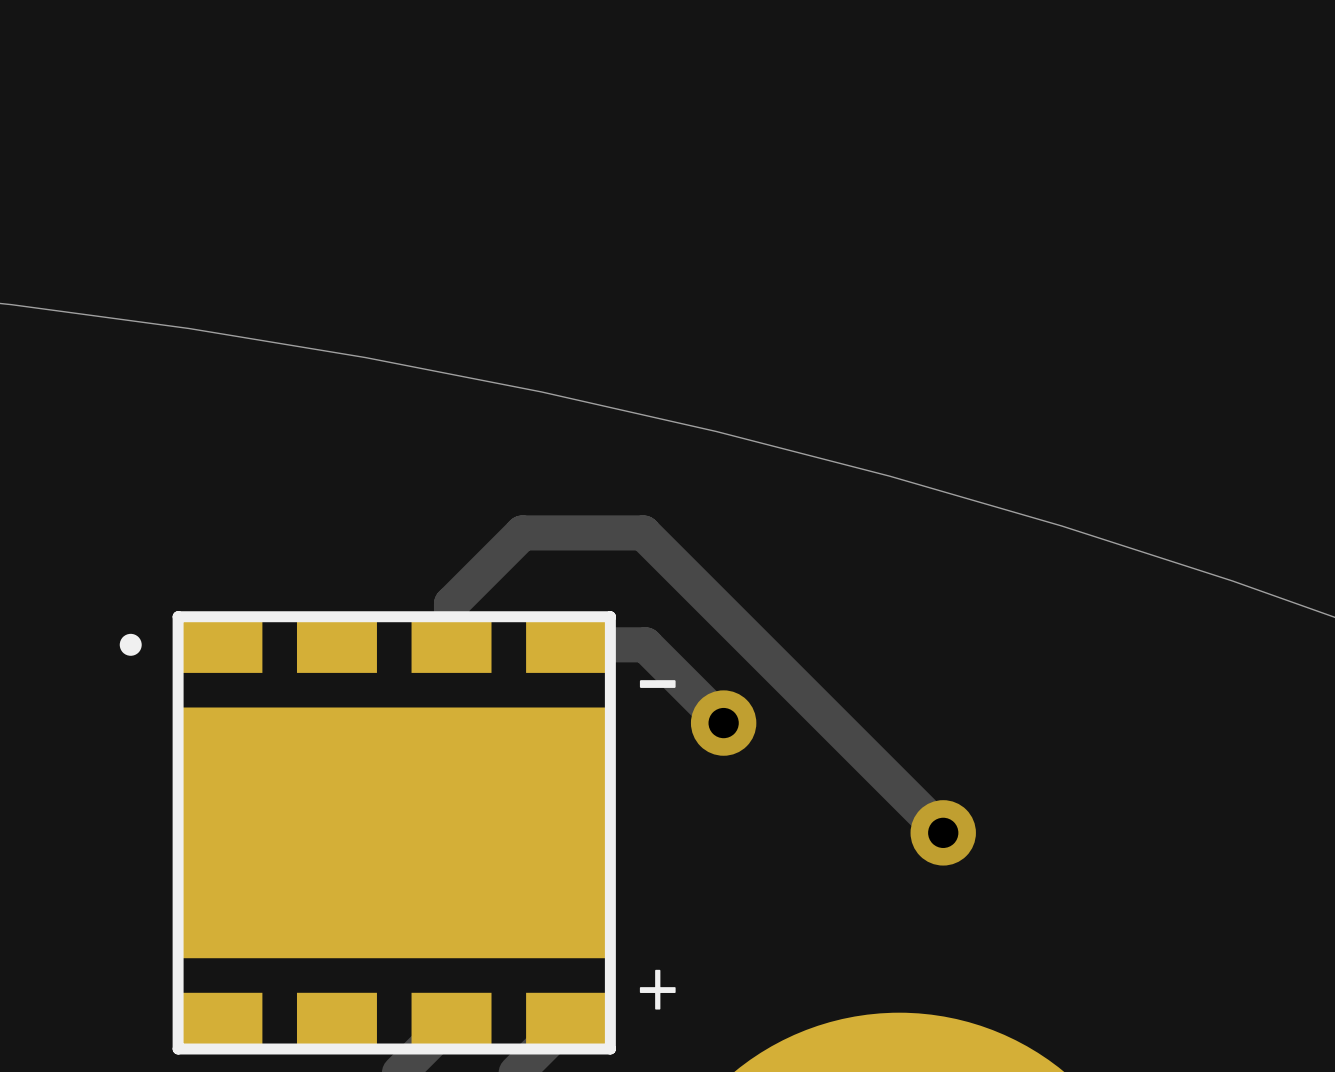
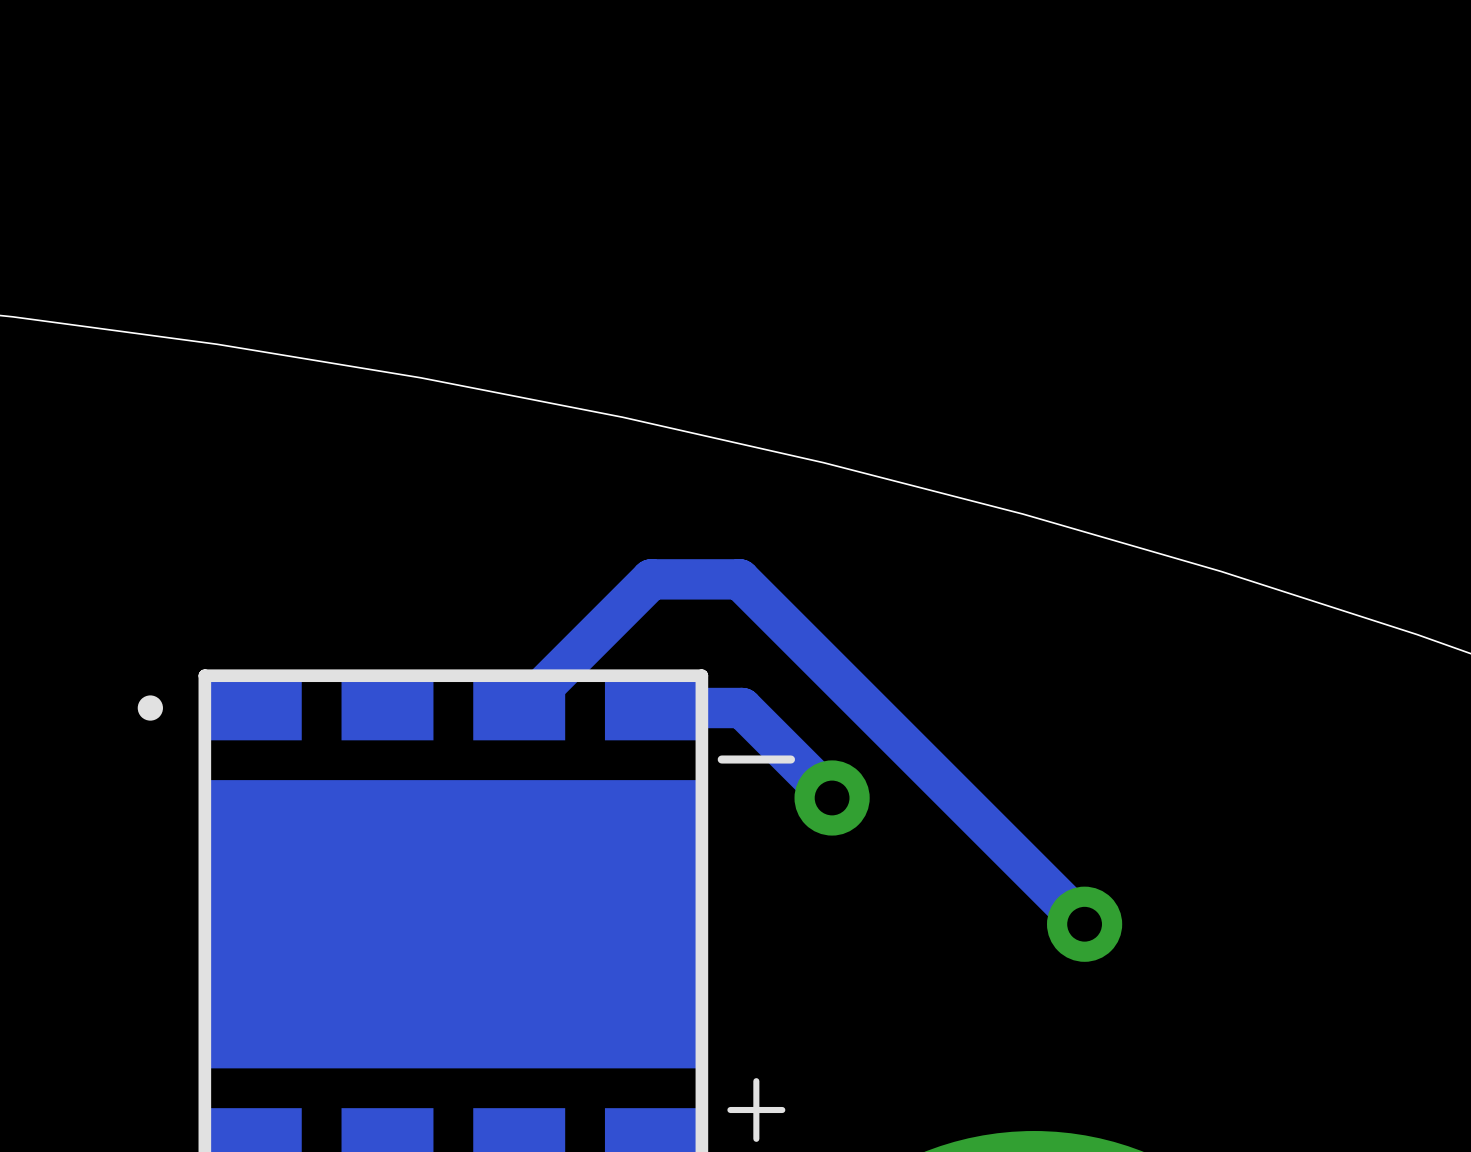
track: (566, 532) (522, 532) (451, 603) (451, 644) -> (651, 579) (522, 708) (519, 708)

